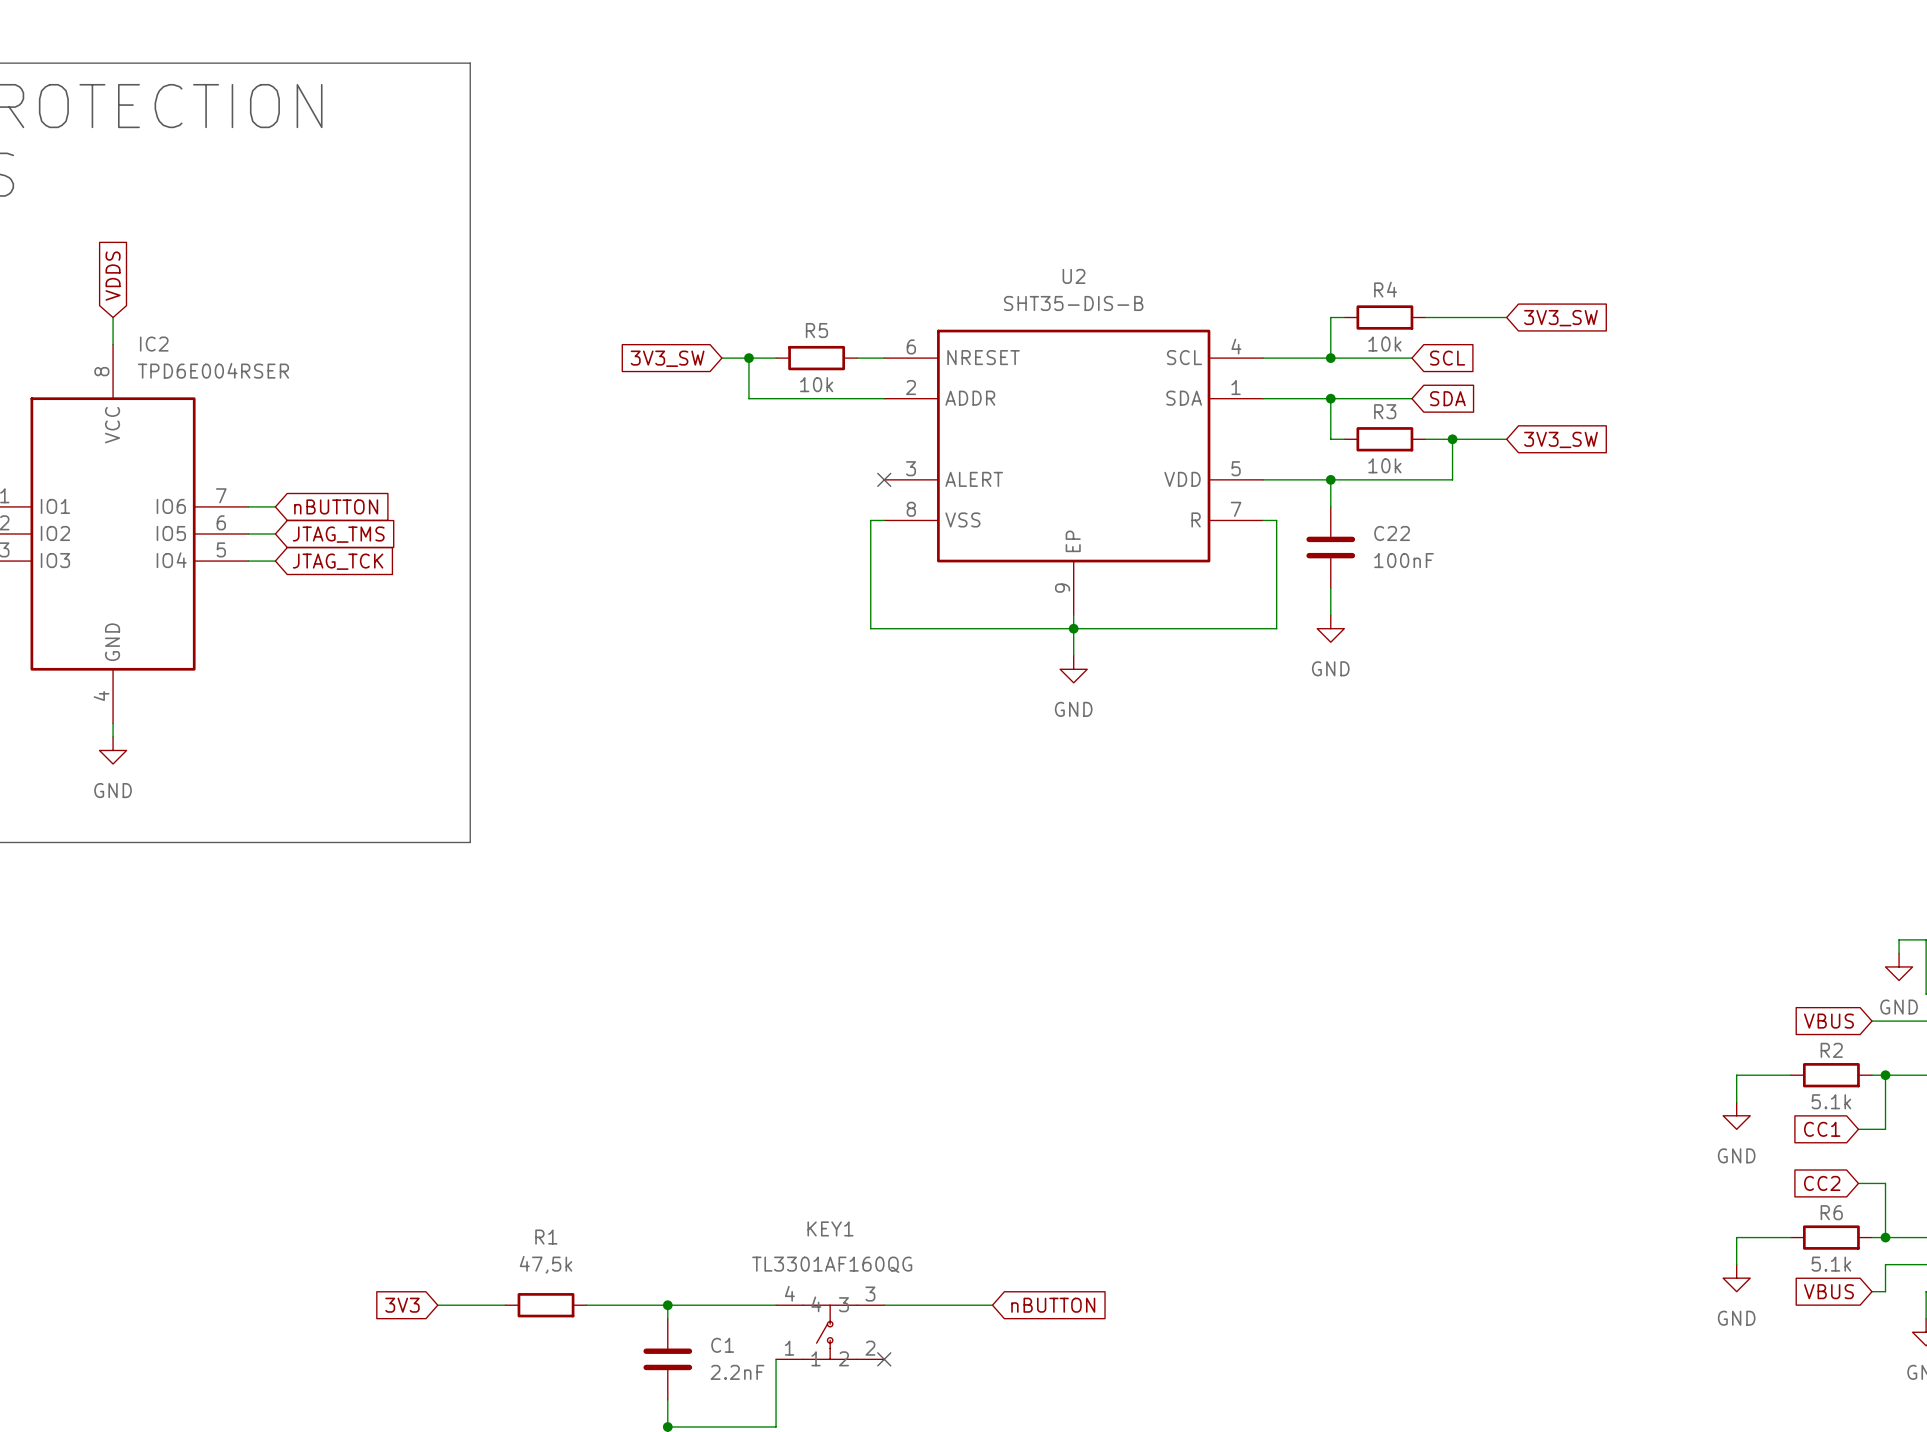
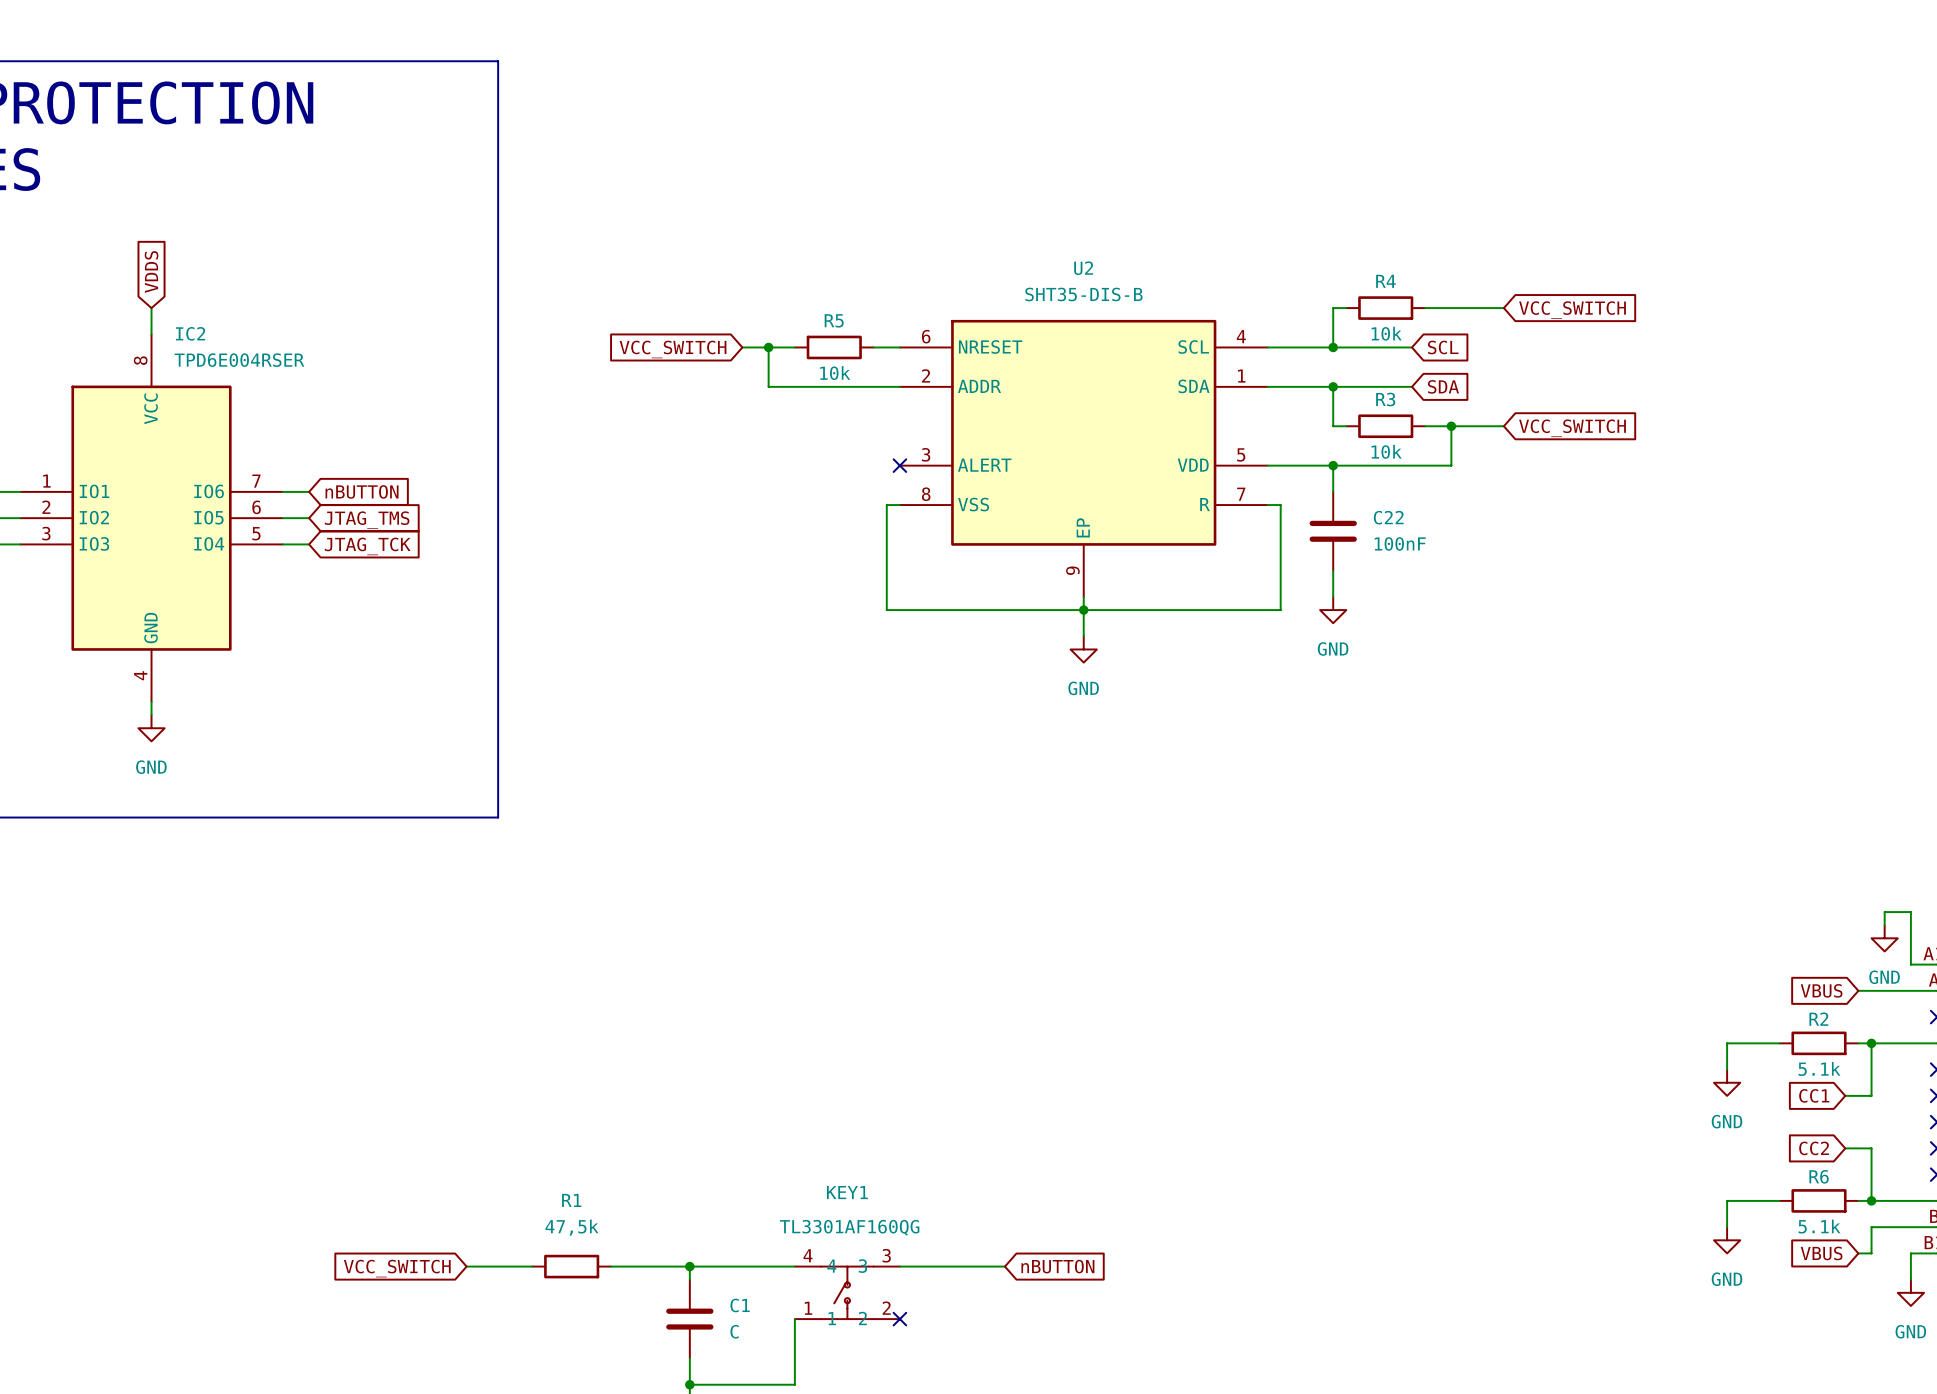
global label: 3V3_SW (1560, 318) -> VCC_SWITCH (1572, 310)
global label: 3V3_SW (667, 358) -> VCC_SWITCH (673, 349)
global label: 3V3_SW (1560, 439) -> VCC_SWITCH (1572, 428)
global label: 3V3 (402, 1305) -> VCC_SWITCH (397, 1268)
C1 value: 2.2nF (737, 1372) -> C (734, 1331)

